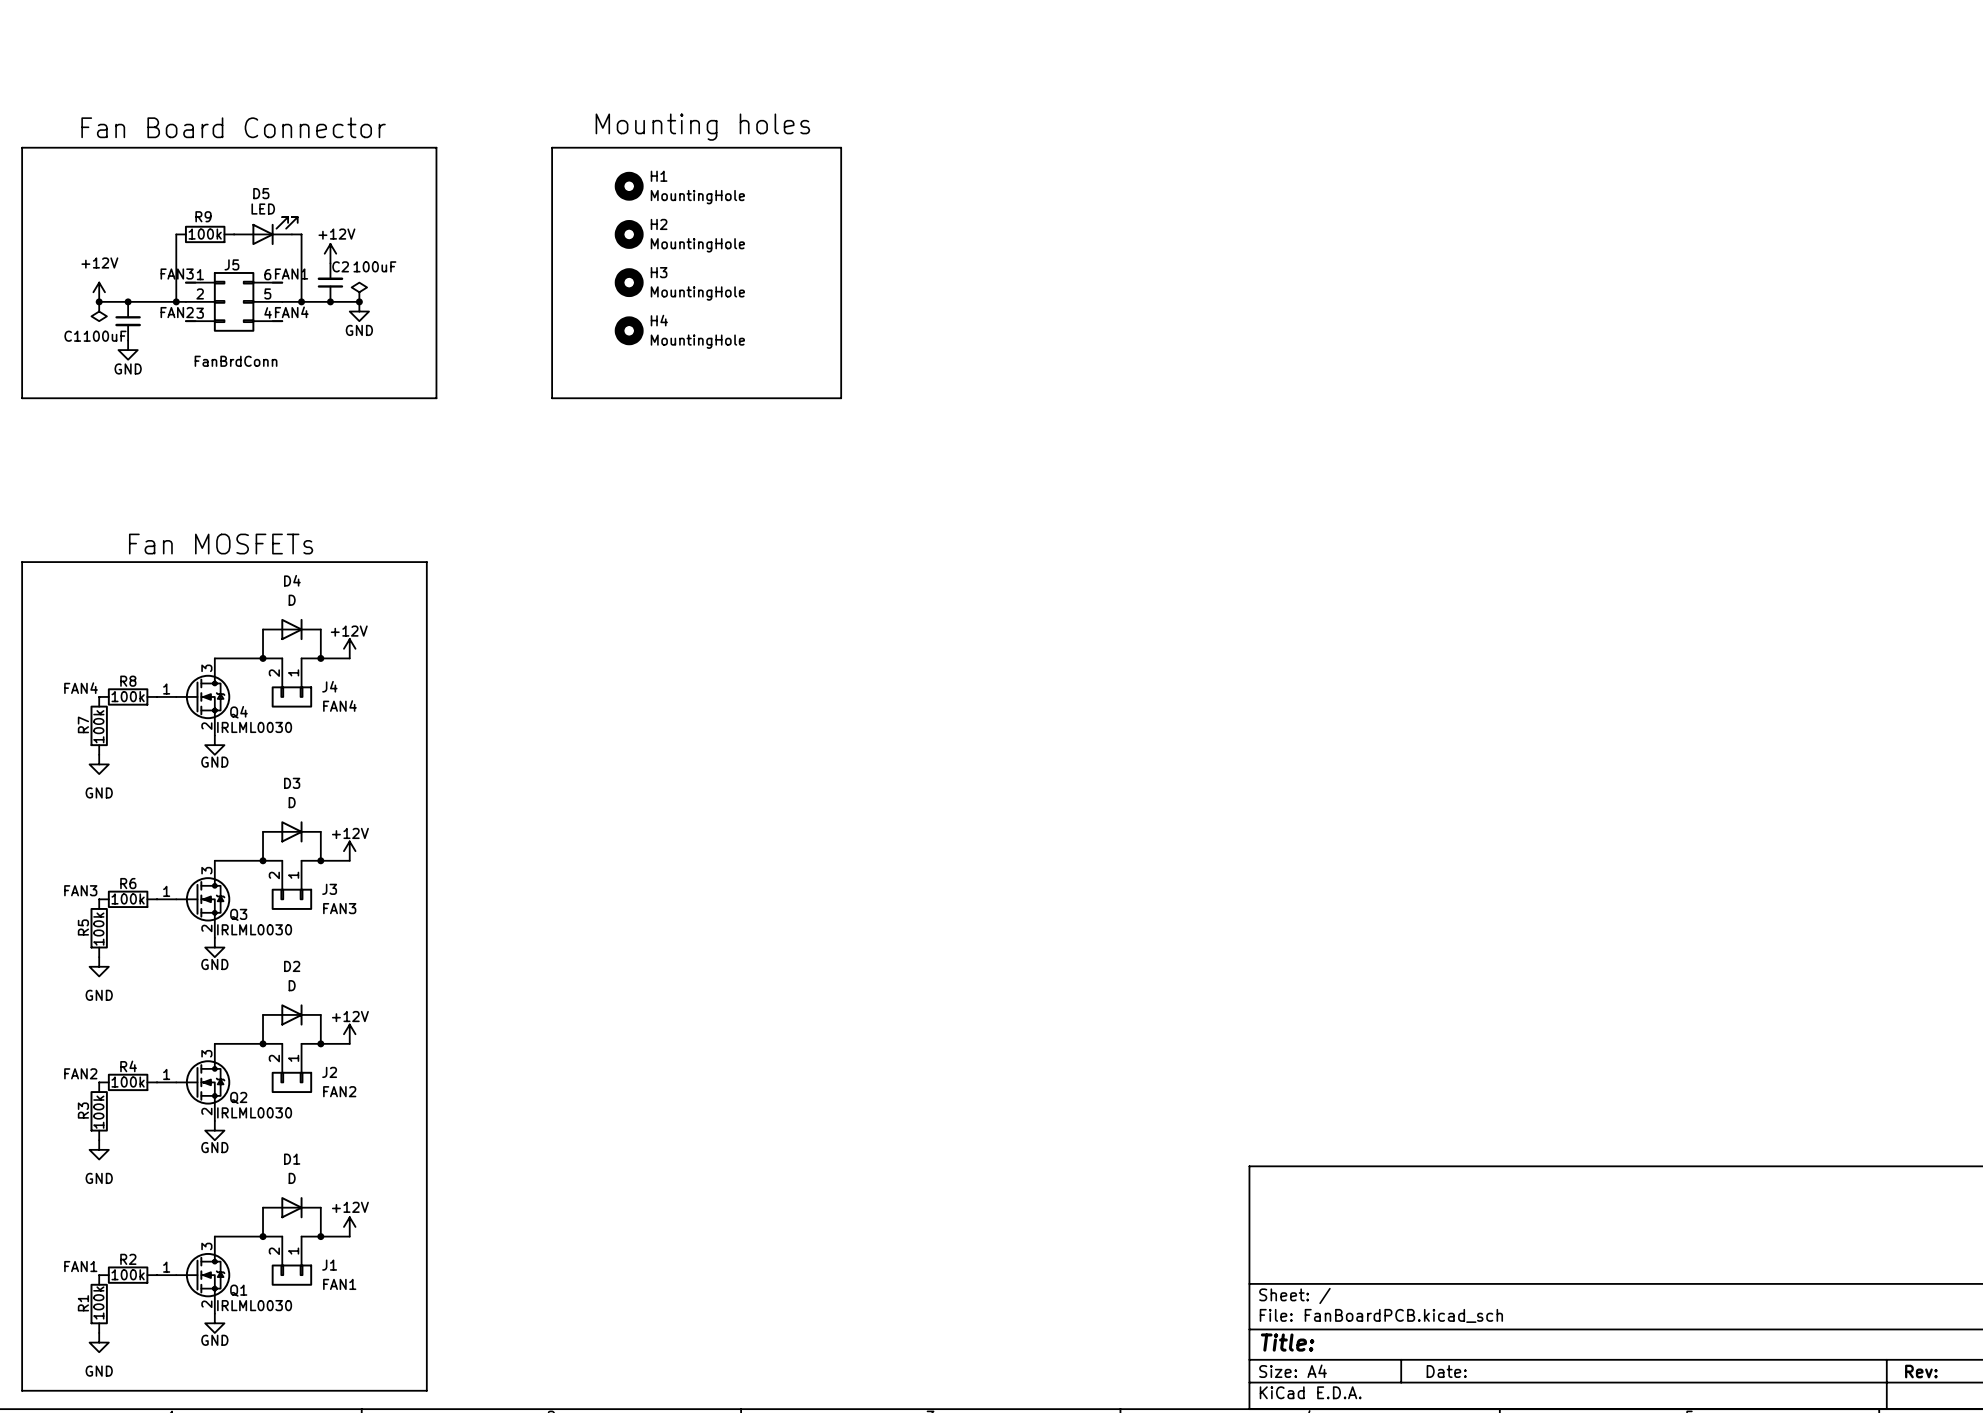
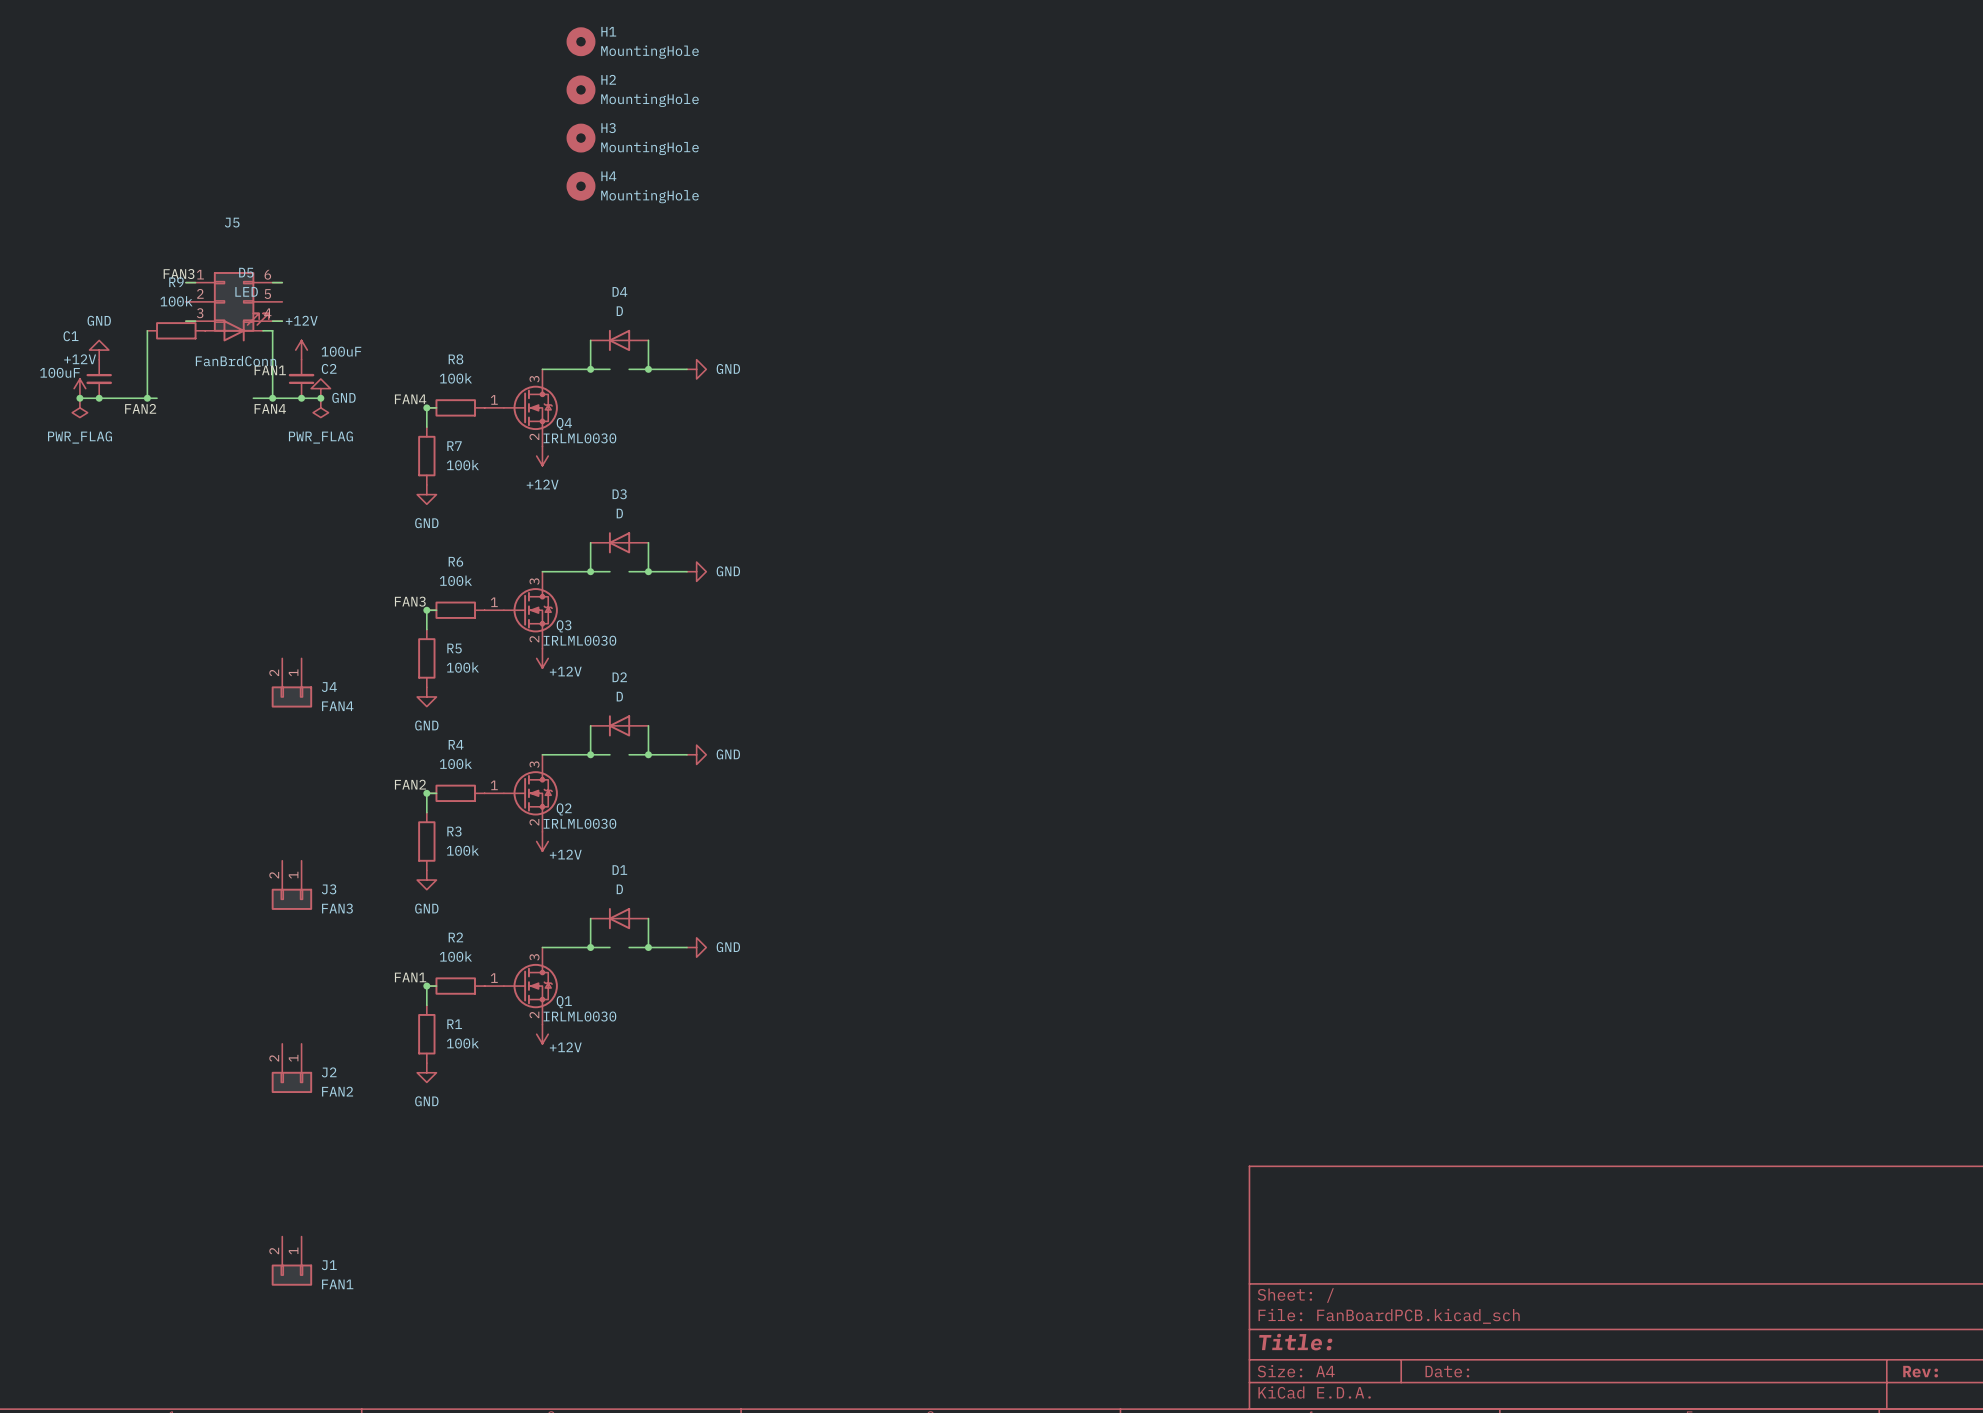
text: Fan Board Connector (233, 127) -> none
text: Mounting holes (702, 127) -> none
line: (22, 147) (436, 147) (436, 398) (22, 398) (22, 147) -> none
line: (552, 147) (841, 147) (841, 398) (552, 398) (552, 147) -> none
H1 position: (629, 186) -> (581, 41)
D5 name position: D5 (261, 193) -> D5 (246, 272)
D5 value position: LED (263, 209) -> LED (246, 291)
R9 name position: R9 (203, 216) -> R9 (176, 282)
D5 position: (265, 231) -> (236, 327)
wire: (176, 234) (176, 301) -> (147, 330) (147, 398)
R9 position: (205, 234) -> (176, 330)
R9 value position: 100k (205, 234) -> 100k (176, 301)
wire: (291, 234) (301, 234) (301, 301) -> (263, 330) (272, 330) (272, 398)
power symbol text position: +12V (336, 234) -> +12V (301, 320)
H2 position: (629, 234) -> (581, 89)
power symbol position: +12V (330, 253) -> +12V (301, 350)
J5 name position: J5 (231, 264) -> J5 (232, 222)
C2 name position: C2 (340, 266) -> C2 (329, 368)
C2 value position: 100uF (374, 266) -> 100uF (341, 351)
label position: FAN1 (291, 274) -> FAN1 (270, 370)
C2 position: (330, 282) -> (301, 378)
H3 position: (629, 282) -> (581, 138)
power symbol position: +12V (99, 292) -> +12V (79, 388)
power symbol: (359, 292) -> none
wire: (99, 301) (185, 301) -> none
junction: (99, 301) -> none
junction: (128, 301) -> none
junction: (176, 301) -> none
wire: (282, 301) (359, 301) -> none
junction: (301, 301) -> none
junction: (330, 301) -> none
junction: (359, 301) -> none
power symbol: (99, 311) -> none
power symbol rotation: 0° (359, 311) -> 180° (320, 388)
power symbol position: GND (359, 311) -> GND (320, 388)
label position: FAN2 (177, 312) -> FAN2 (140, 408)
label: FAN4 (291, 312) -> none
C1 position: (128, 321) -> (99, 378)
power symbol text position: GND (359, 330) -> GND (343, 397)
H4 position: (629, 330) -> (581, 186)
C1 value position: 100uF (105, 336) -> 100uF (60, 372)
wire: none -> (590, 340) (590, 369)
wire: none -> (648, 340) (648, 369)
power symbol rotation: 0° (128, 350) -> 180° (99, 350)
power symbol position: GND (128, 350) -> GND (99, 350)
wire: none -> (542, 369) (609, 369)
junction: none -> (590, 369)
wire: none -> (629, 369) (686, 369)
junction: none -> (648, 369)
power symbol: none -> GND (696, 369)
junction: none -> (79, 398)
junction: none -> (99, 398)
junction: none -> (147, 398)
junction: none -> (272, 398)
junction: none -> (301, 398)
junction: none -> (320, 398)
label: none -> FAN4 (410, 399)
power symbol: none -> PWR_FLAG (79, 407)
power symbol: none -> PWR_FLAG (320, 407)
junction: none -> (426, 407)
wire: none -> (436, 407) (426, 407) (426, 427)
label: none -> FAN4 (270, 408)
power symbol: none -> +12V (542, 456)
power symbol: none -> GND (426, 494)
wire: none -> (590, 542) (590, 571)
wire: none -> (648, 542) (648, 571)
text: Fan MOSFETs (221, 544) -> none
line: (22, 562) (22, 1390) (426, 1390) (426, 562) (22, 562) -> none
wire: none -> (542, 571) (609, 571)
junction: none -> (590, 571)
wire: none -> (629, 571) (686, 571)
junction: none -> (648, 571)
power symbol: none -> GND (696, 571)
label: none -> FAN3 (410, 601)
junction: none -> (426, 610)
wire: (263, 629) (263, 658) -> none
D4 rotation: 0° (291, 629) -> 180° (619, 340)
D4 position: (291, 629) -> (619, 340)
wire: (320, 629) (320, 658) -> none
power symbol: +12V (349, 648) -> none
wire: (214, 658) (282, 658) -> none
junction: (263, 658) -> none
wire: (301, 658) (349, 658) -> none
junction: (320, 658) -> none
power symbol: none -> +12V (542, 658)
R8 name position: R8 (128, 681) -> R8 (455, 359)
label: FAN4 (81, 688) -> none
R8 position: (128, 696) -> (455, 407)
R8 value position: 100k (128, 696) -> 100k (455, 378)
Q4 position: (193, 696) -> (521, 407)
power symbol: none -> GND (426, 696)
R7 name rotation: 0° (83, 724) -> 90° clockwise (454, 446)
R7 name position: R7 (83, 724) -> R7 (454, 446)
R7 position: (99, 725) -> (426, 456)
wire: none -> (590, 725) (590, 754)
wire: none -> (648, 725) (648, 754)
R7 value rotation: 0° (98, 726) -> 90° clockwise (462, 465)
power symbol: GND (214, 745) -> none
wire: none -> (542, 754) (609, 754)
junction: none -> (590, 754)
wire: none -> (629, 754) (686, 754)
junction: none -> (648, 754)
power symbol: none -> GND (696, 754)
power symbol: GND (99, 764) -> none
label: none -> FAN2 (410, 784)
junction: none -> (426, 793)
wire: (263, 831) (263, 860) -> none
D3 rotation: 0° (291, 831) -> 180° (619, 542)
D3 position: (291, 831) -> (619, 542)
wire: (320, 831) (320, 860) -> none
power symbol: none -> +12V (542, 841)
power symbol: +12V (349, 851) -> none
wire: (214, 860) (282, 860) -> none
junction: (263, 860) -> none
wire: (301, 860) (349, 860) -> none
junction: (320, 860) -> none
power symbol: none -> GND (426, 880)
R6 name position: R6 (128, 883) -> R6 (455, 561)
label: FAN3 (80, 890) -> none
R6 value position: 100k (128, 898) -> 100k (455, 580)
R6 position: (128, 899) -> (455, 610)
Q3 position: (193, 899) -> (521, 610)
wire: none -> (590, 918) (590, 947)
wire: none -> (648, 918) (648, 947)
R5 name rotation: 0° (83, 927) -> 90° clockwise (454, 648)
R5 name position: R5 (83, 927) -> R5 (454, 648)
R5 position: (99, 928) -> (426, 658)
R5 value rotation: 0° (98, 929) -> 90° clockwise (462, 667)
power symbol: GND (214, 947) -> none
wire: none -> (542, 947) (609, 947)
junction: none -> (590, 947)
wire: none -> (629, 947) (686, 947)
junction: none -> (648, 947)
power symbol: none -> GND (696, 947)
power symbol: GND (99, 966) -> none
label: none -> FAN1 (410, 977)
junction: none -> (426, 986)
wire: (263, 1014) (263, 1043) -> none
D2 rotation: 0° (291, 1014) -> 180° (619, 725)
D2 position: (291, 1014) -> (619, 725)
wire: (320, 1014) (320, 1043) -> none
power symbol: +12V (349, 1034) -> none
power symbol: none -> +12V (542, 1034)
wire: (214, 1043) (282, 1043) -> none
junction: (263, 1043) -> none
wire: (301, 1043) (349, 1043) -> none
junction: (320, 1043) -> none
R4 name position: R4 (128, 1066) -> R4 (456, 744)
power symbol: none -> GND (426, 1072)
label: FAN2 (80, 1073) -> none
R4 position: (128, 1082) -> (455, 793)
R4 value position: 100k (128, 1082) -> 100k (455, 763)
Q2 position: (193, 1082) -> (521, 793)
R3 name rotation: 0° (83, 1110) -> 90° clockwise (454, 831)
R3 name position: R3 (83, 1110) -> R3 (454, 831)
R3 position: (99, 1111) -> (426, 841)
R3 value rotation: 0° (98, 1112) -> 90° clockwise (462, 850)
power symbol: GND (214, 1130) -> none
power symbol: GND (99, 1149) -> none
wire: (263, 1207) (263, 1236) -> none
D1 rotation: 0° (291, 1207) -> 180° (619, 918)
D1 position: (291, 1207) -> (619, 918)
wire: (320, 1207) (320, 1236) -> none
power symbol: +12V (349, 1226) -> none
wire: (214, 1236) (282, 1236) -> none
junction: (263, 1236) -> none
wire: (301, 1236) (349, 1236) -> none
junction: (320, 1236) -> none
R2 name position: R2 (128, 1259) -> R2 (455, 937)
label: FAN1 (80, 1266) -> none
R2 value position: 100k (128, 1274) -> 100k (455, 956)
R2 position: (128, 1275) -> (455, 986)
Q1 position: (193, 1275) -> (521, 986)
R1 value rotation: 0° (98, 1302) -> 90° clockwise (462, 1043)
R1 value position: 100k (98, 1302) -> 100k (462, 1043)
R1 name rotation: 0° (83, 1303) -> 90° clockwise (454, 1024)
R1 name position: R1 (83, 1303) -> R1 (454, 1024)
R1 position: (99, 1304) -> (426, 1034)
power symbol: GND (214, 1323) -> none
power symbol: GND (99, 1342) -> none

